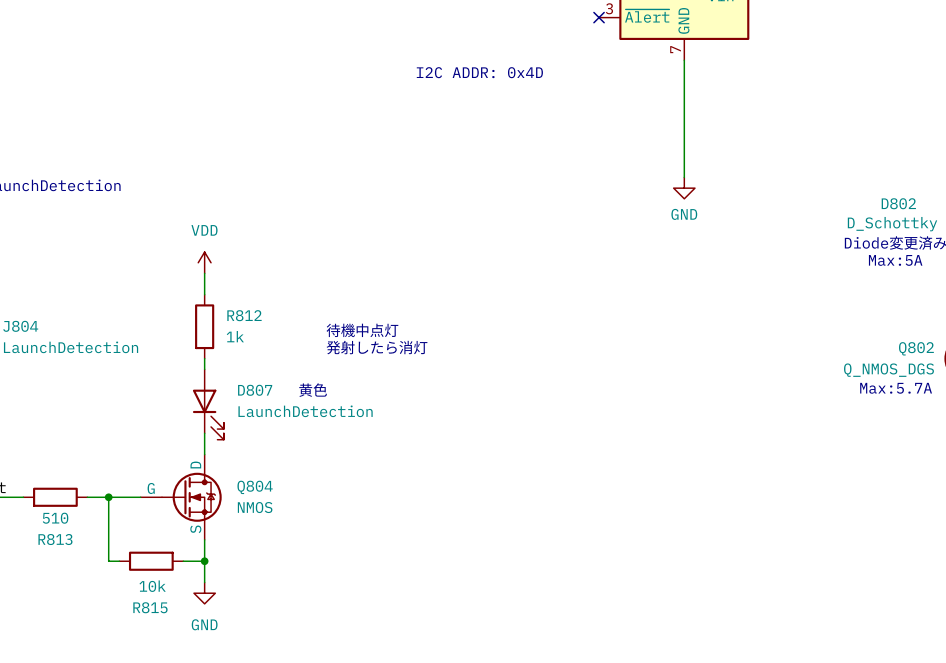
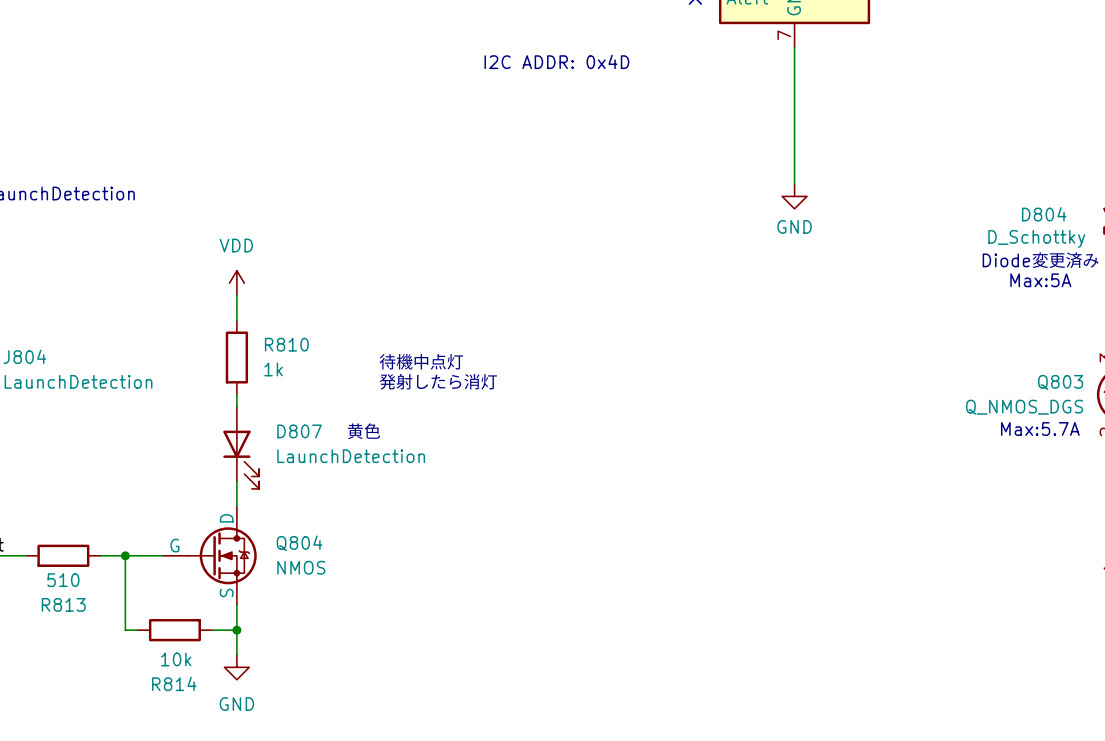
D802 name: D802 (898, 203) -> D804 (1044, 214)
R812 name: R812 (244, 315) -> R810 (286, 344)
Q802 name: Q802 (916, 348) -> Q803 (1060, 382)
R815 name: R815 (150, 607) -> R814 (174, 683)

